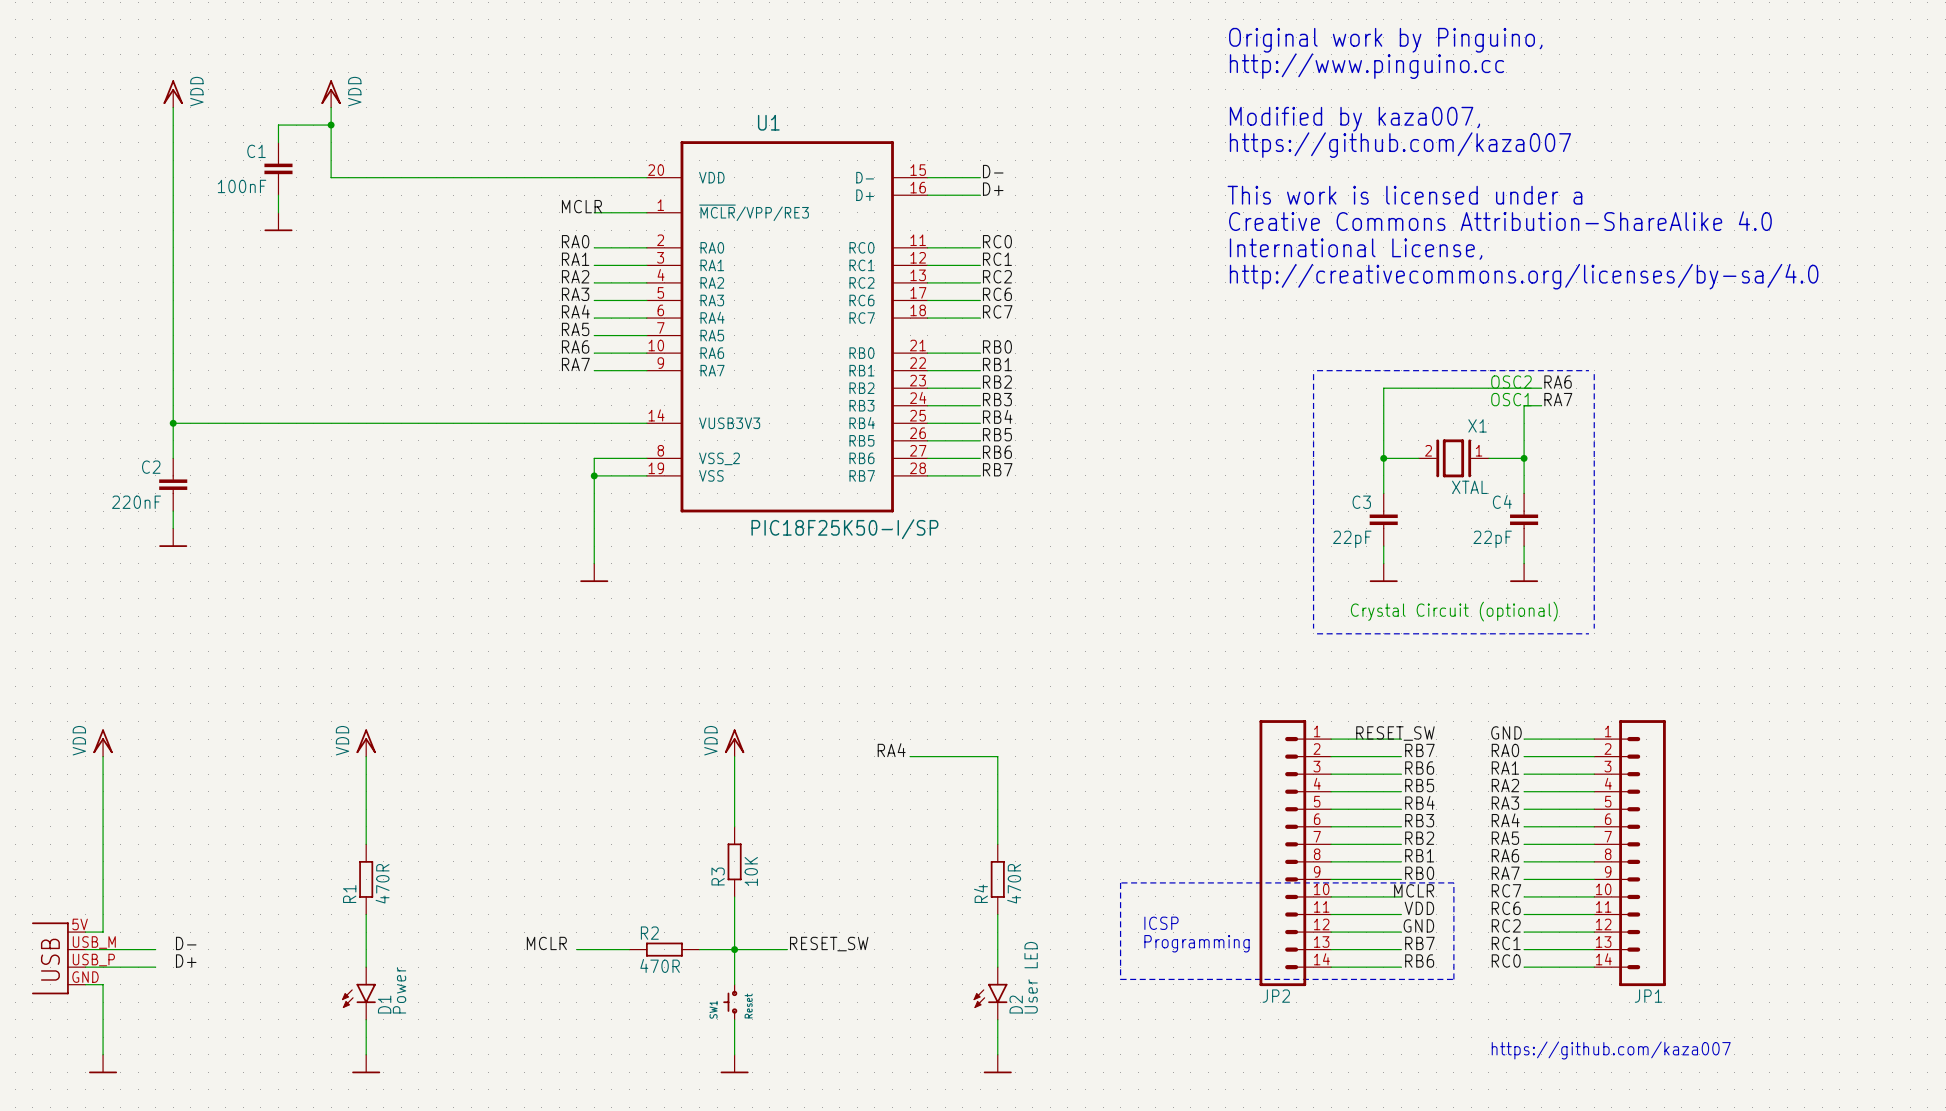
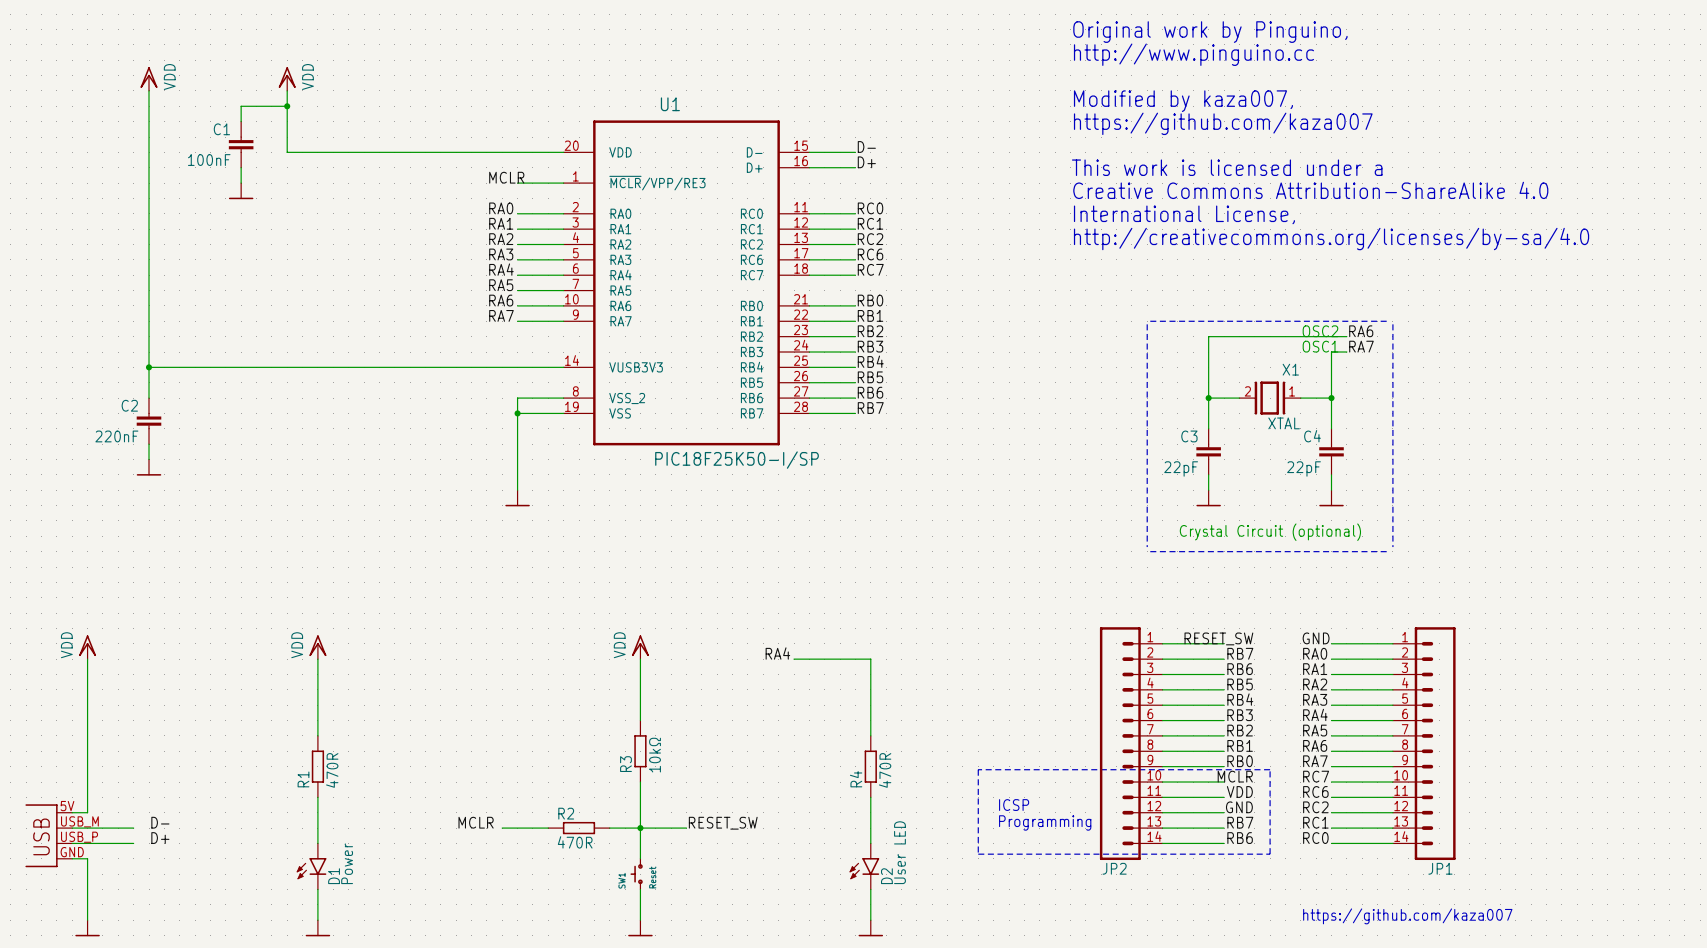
R3 value: 10K (751, 871) -> 10kΩ (655, 755)

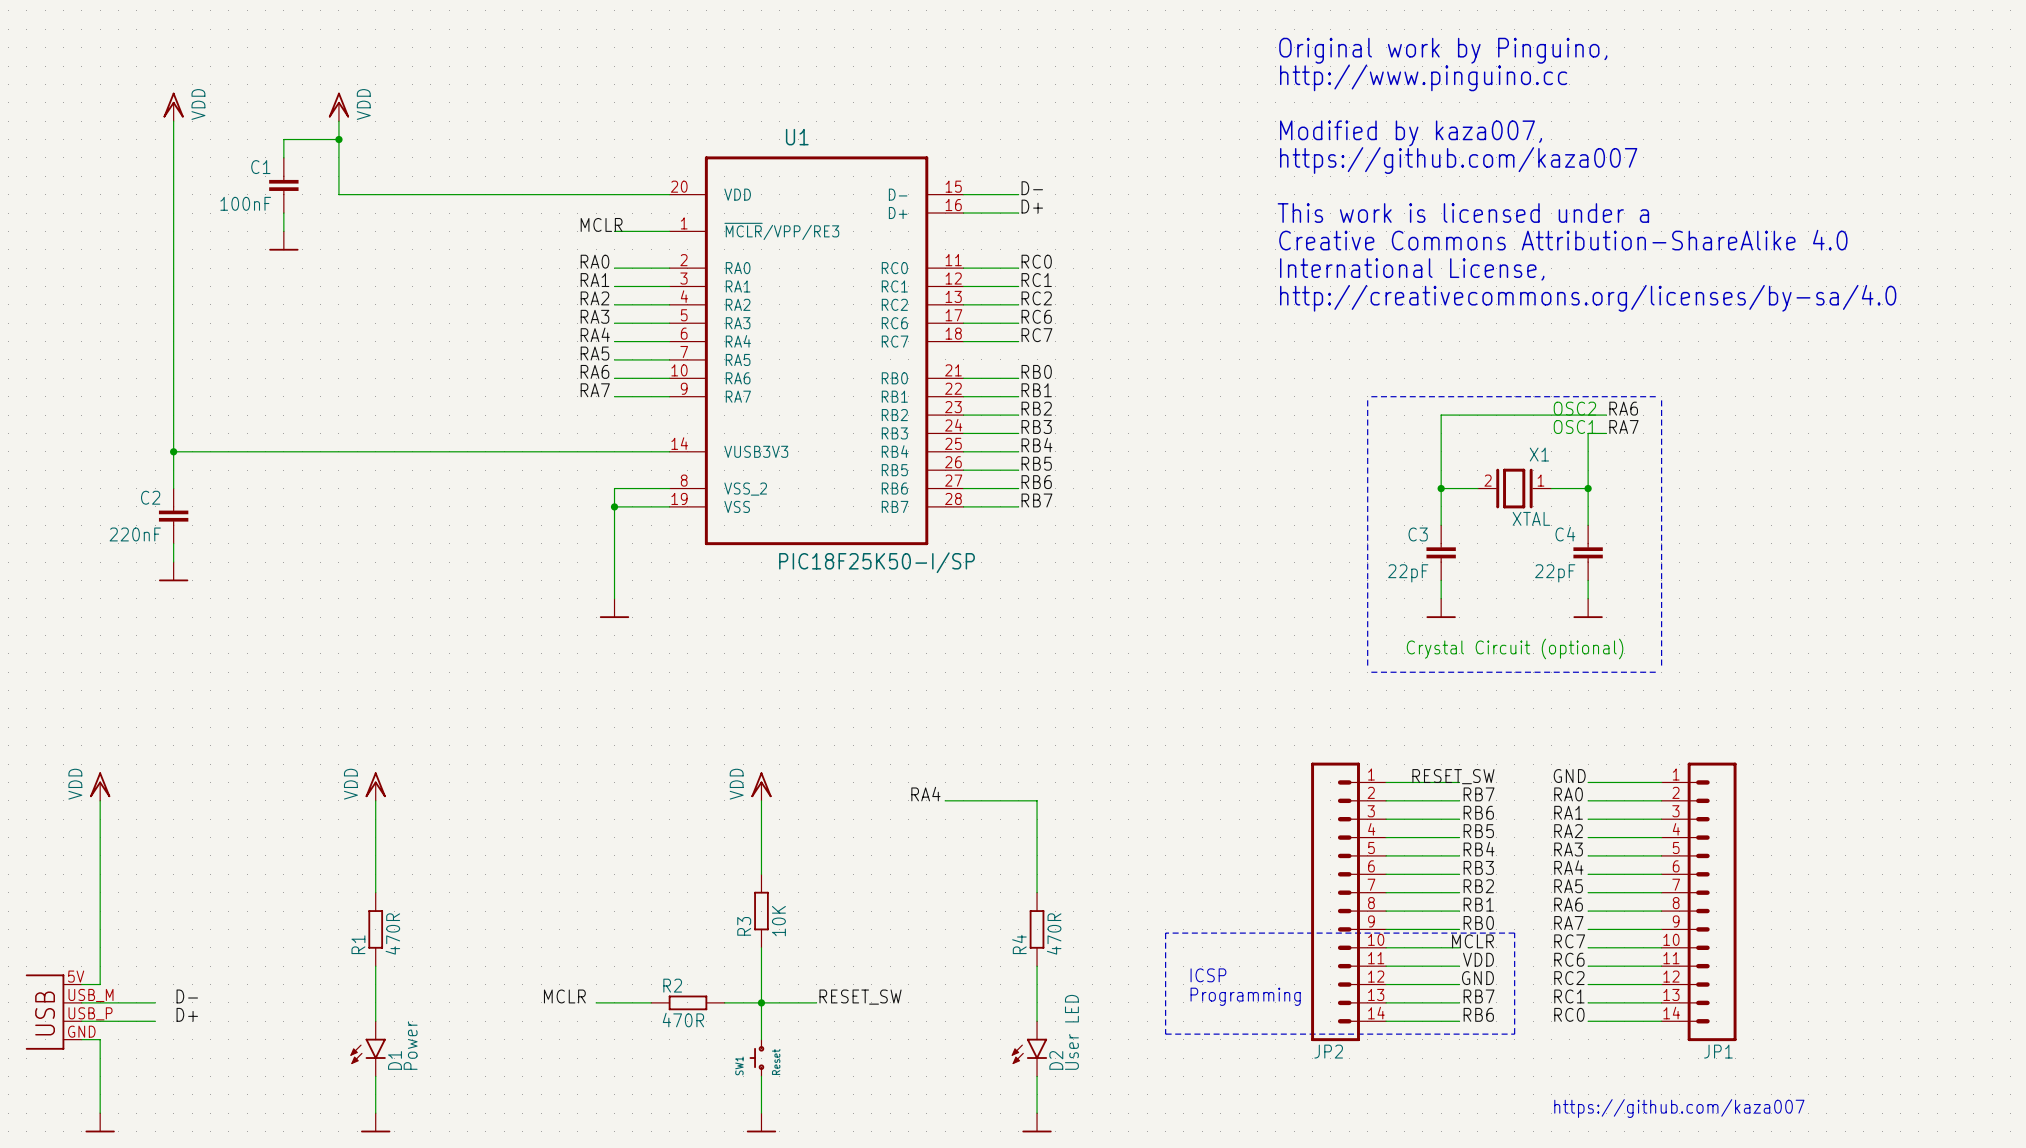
R3 value: 10kΩ (655, 755) -> 10K (778, 921)

